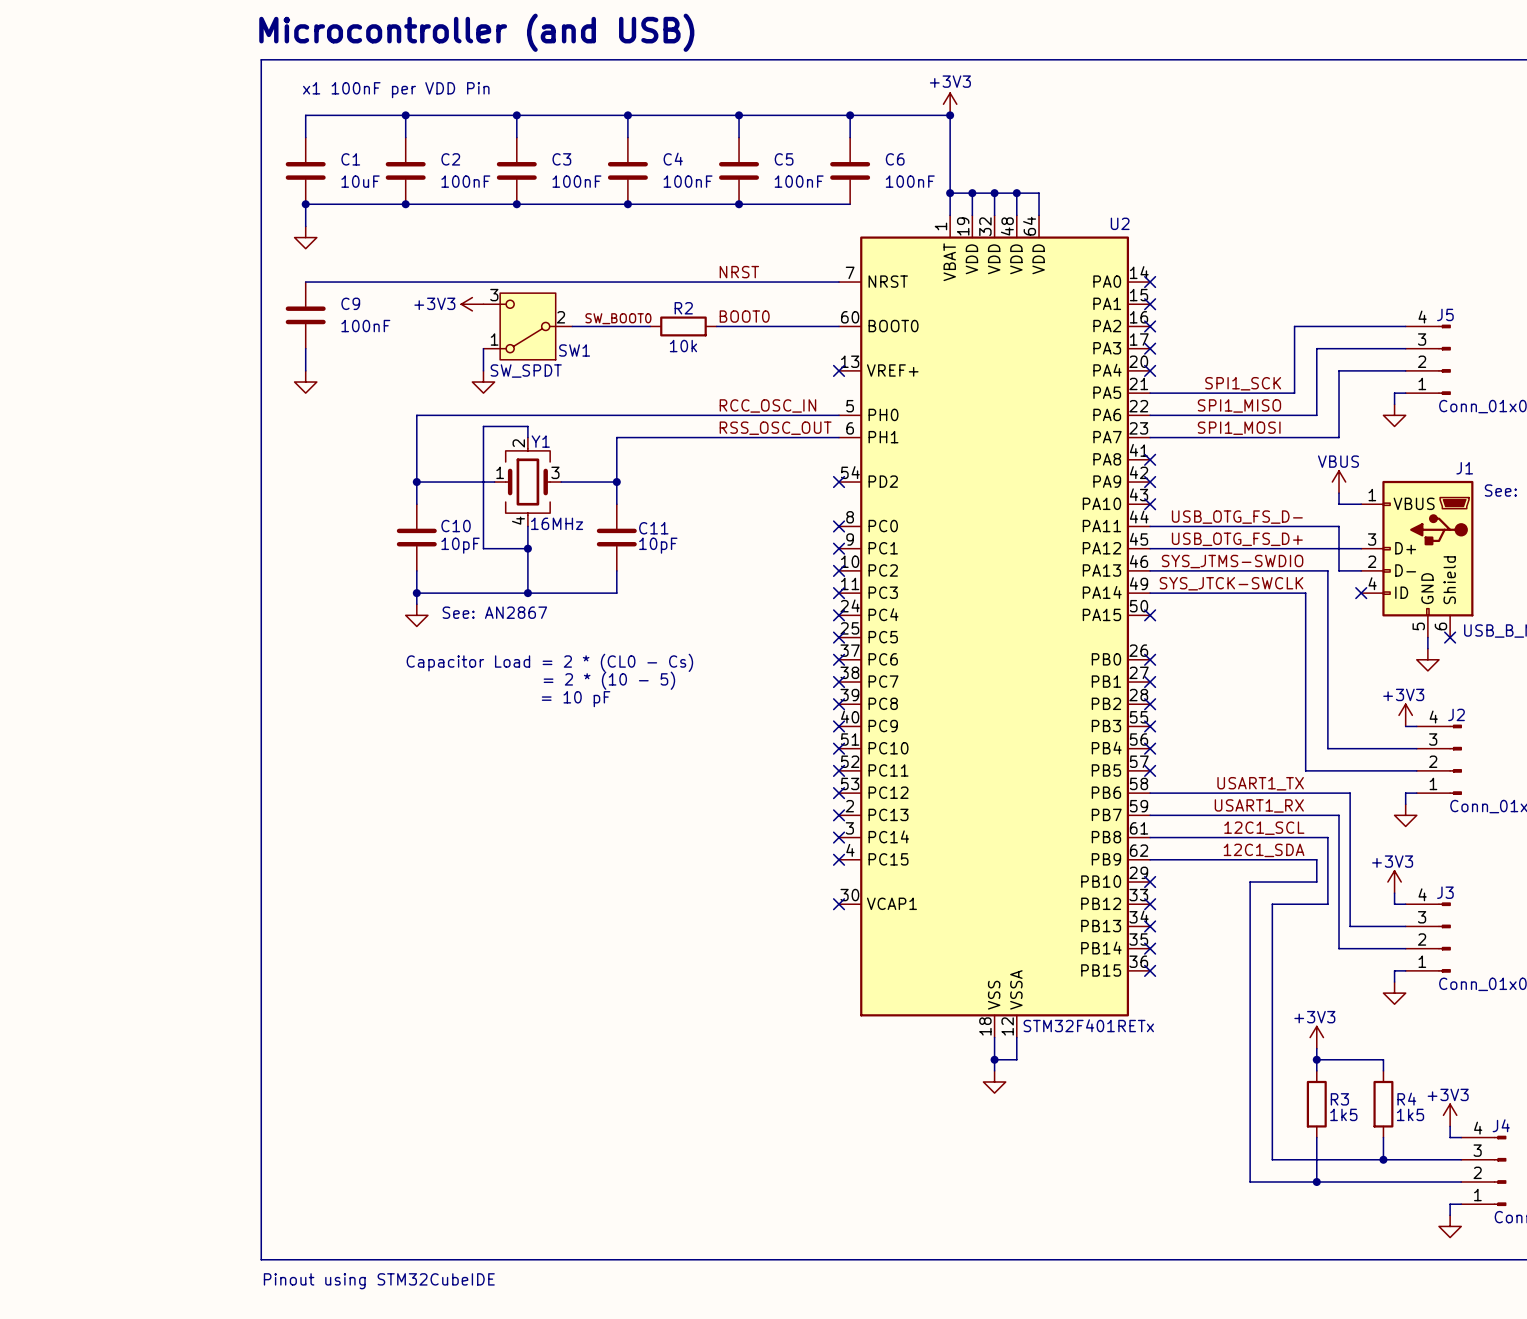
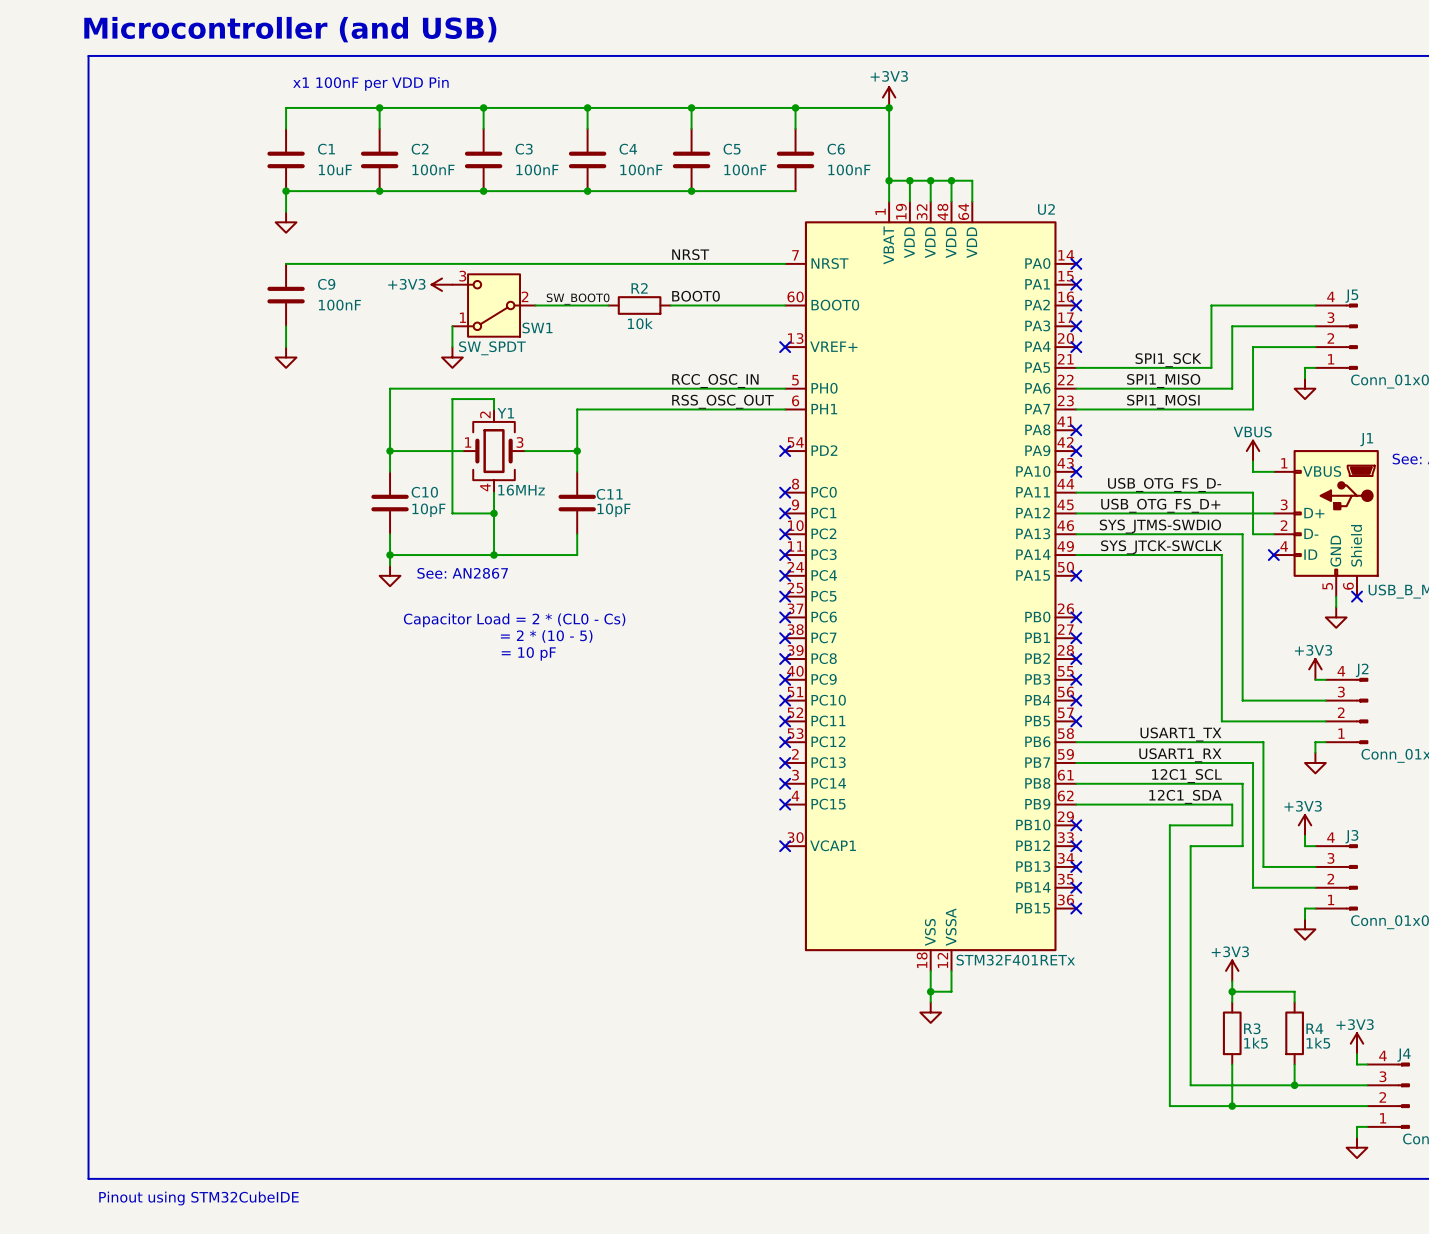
text position: Microcontroller (and USB) (476, 32) -> Microcontroller (and USB) (290, 29)
line: (261, 59) (261, 1259) -> (244, 55) (88, 55) (88, 1178) (244, 1178)
text position: Pinout using STM32CubeIDE (379, 1281) -> Pinout using STM32CubeIDE (198, 1198)

